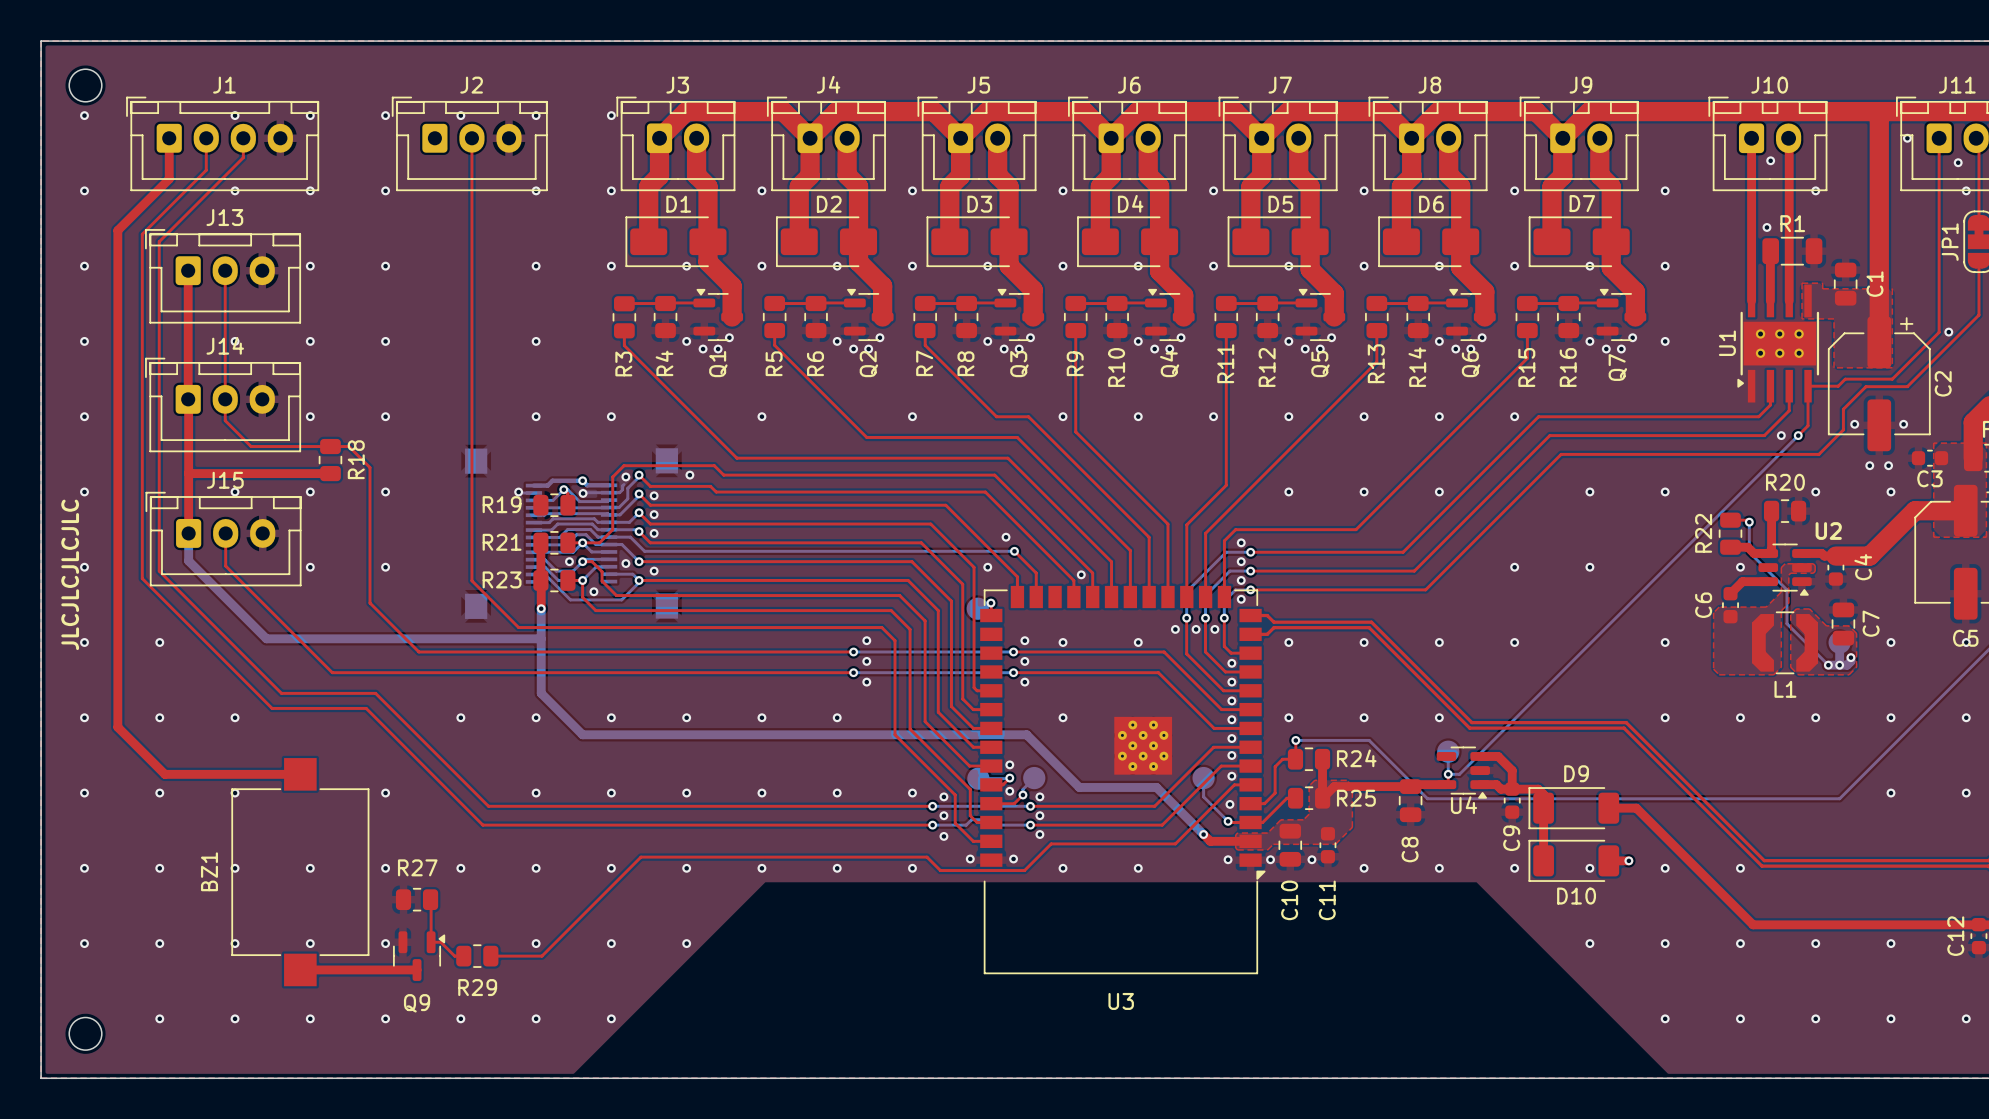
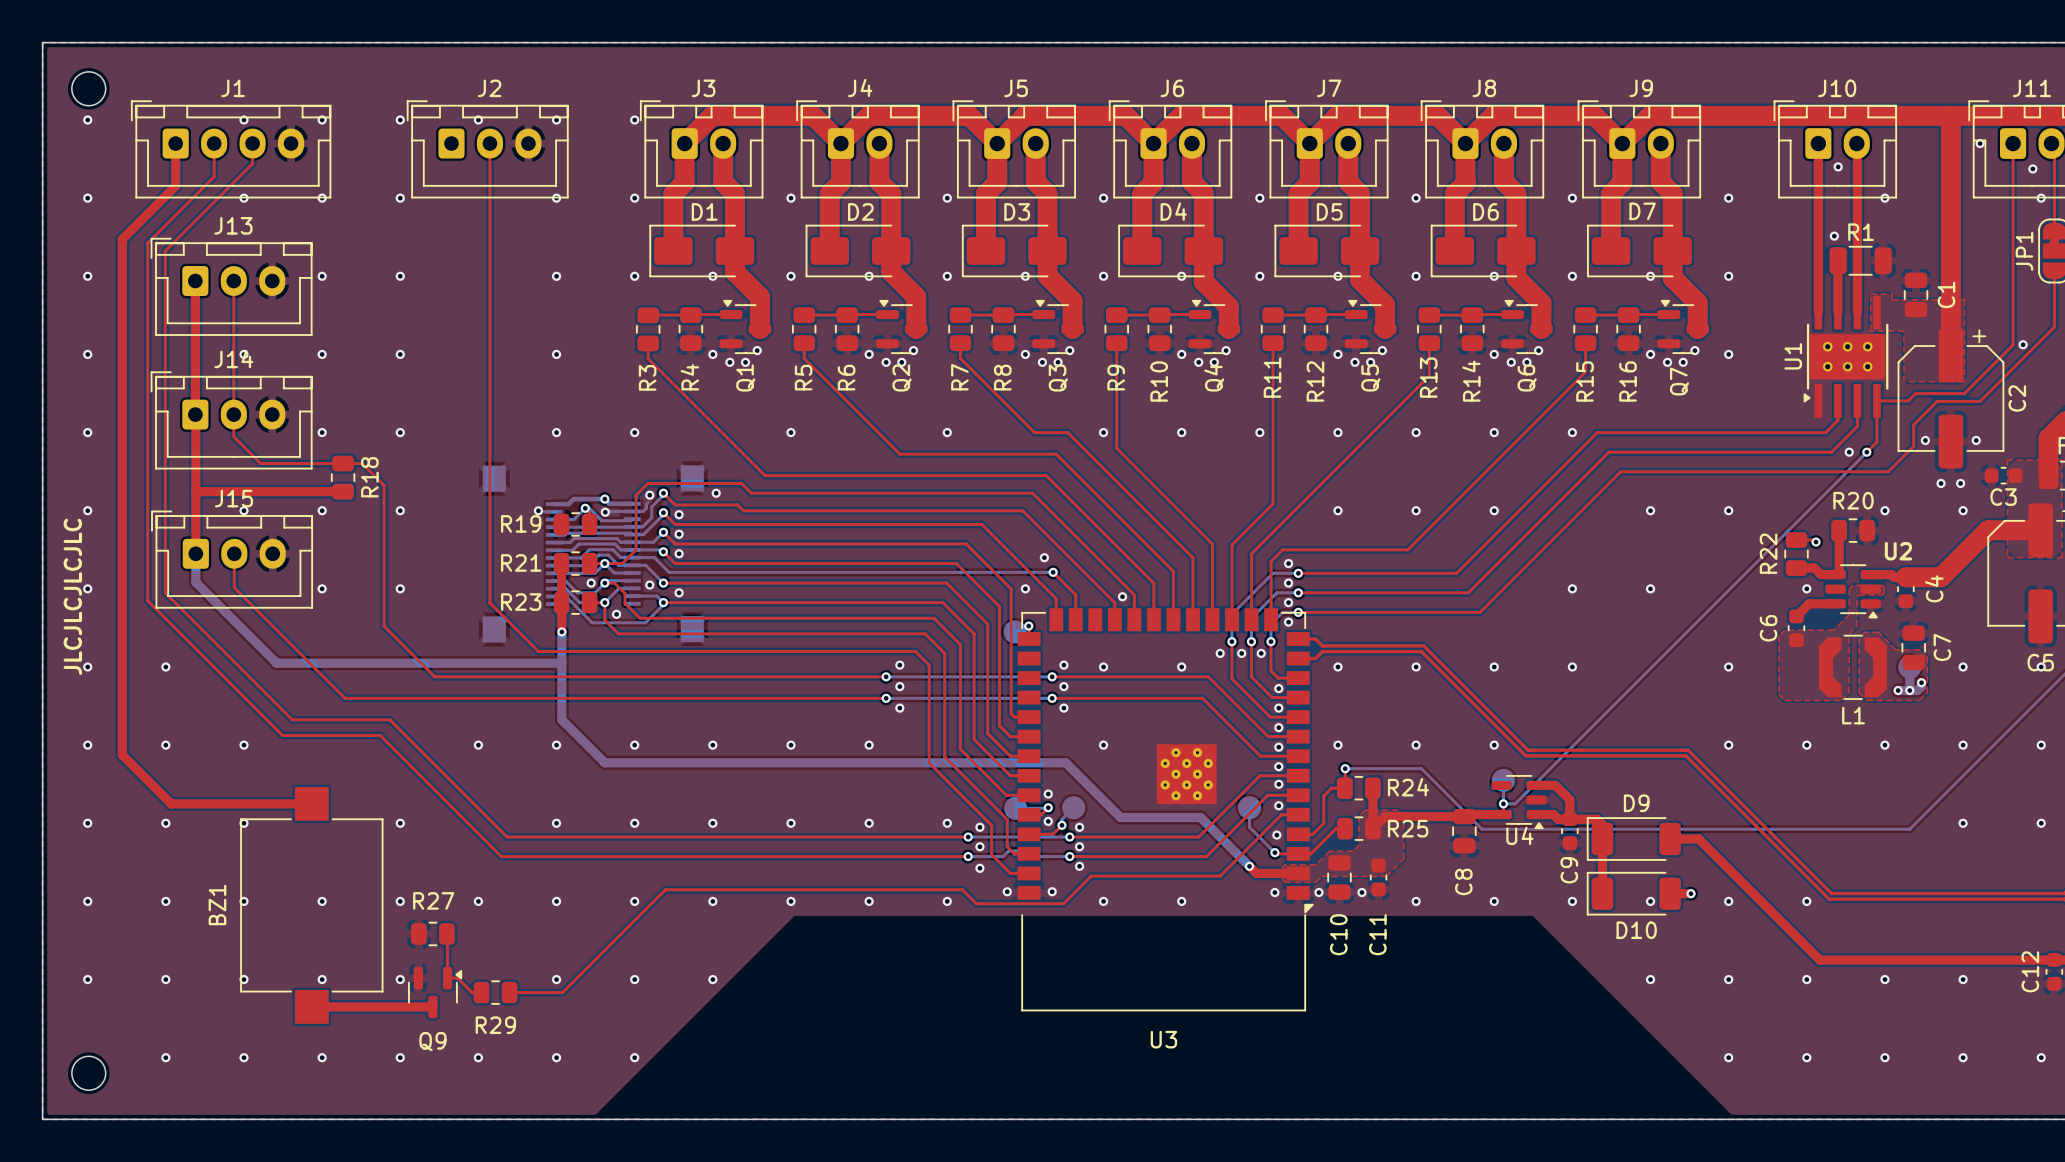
bottom track: (1749, 522) (1749, 552) (1786, 589) (1786, 623) (1828, 665) -> none

